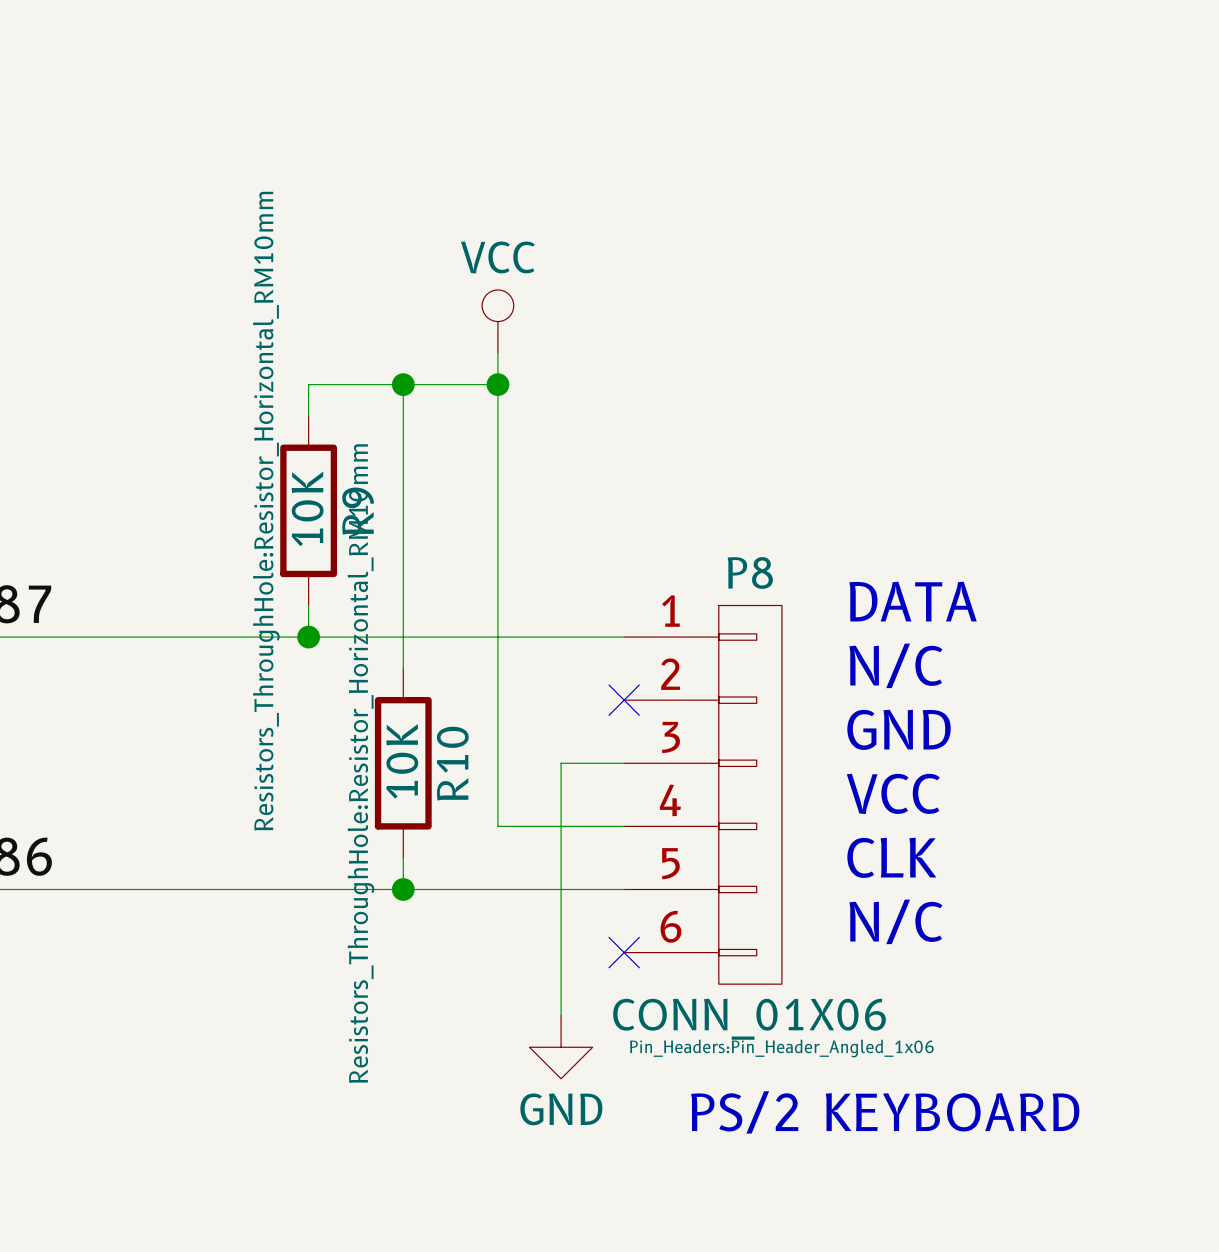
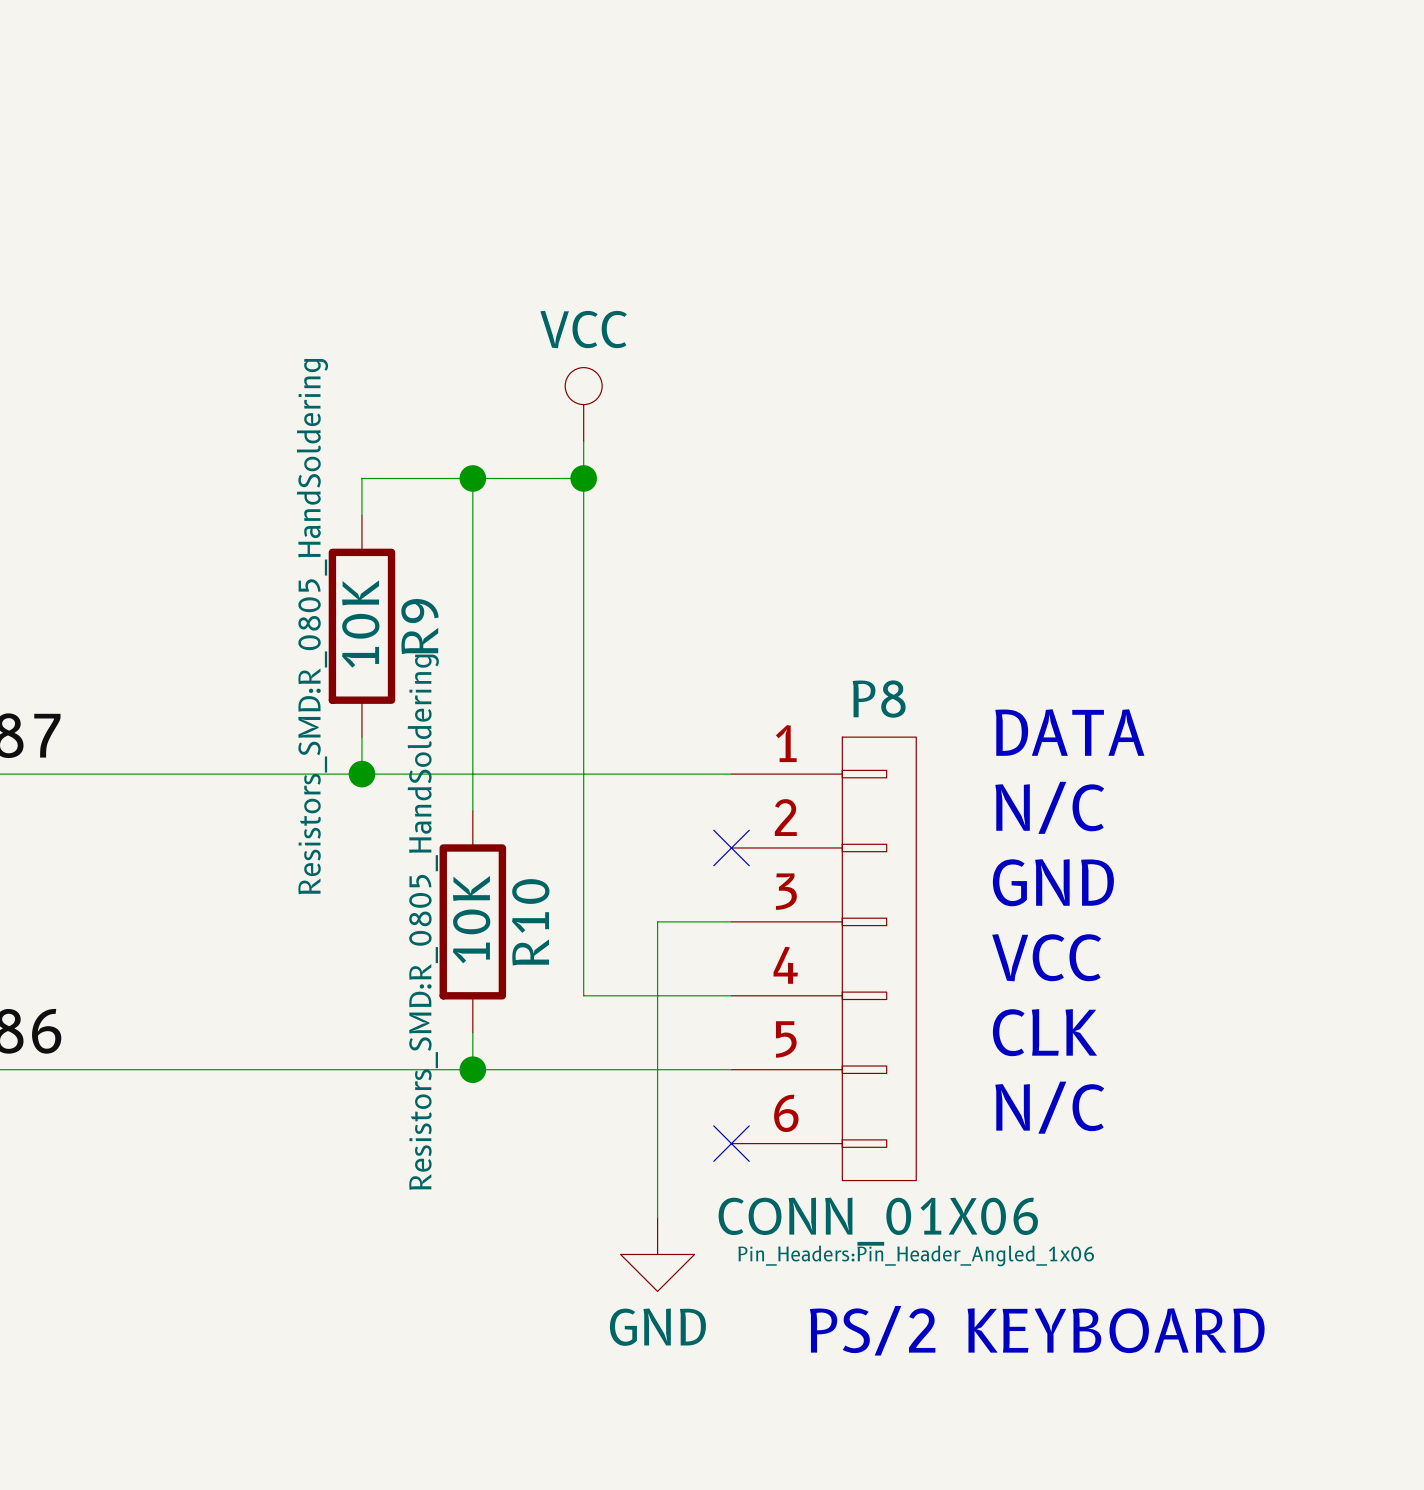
R9 text: Resistors_ThroughHole:Resistor_Horizontal_RM10mm (266, 511) -> Resistors_SMD:R_0805_HandSoldering (312, 626)
R10 text: Resistors_ThroughHole:Resistor_Horizontal_RM10mm (361, 763) -> Resistors_SMD:R_0805_HandSoldering (423, 922)

